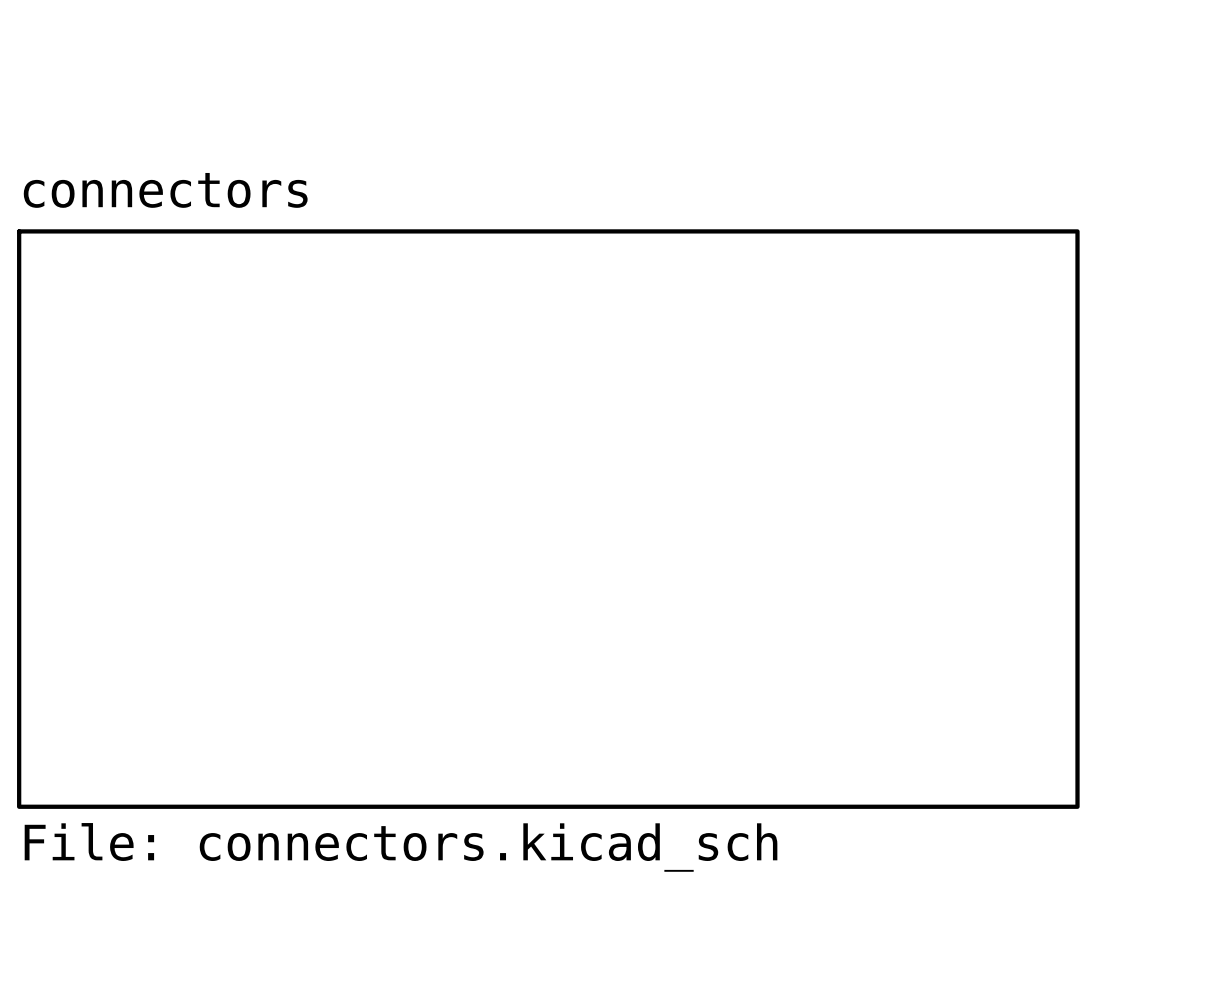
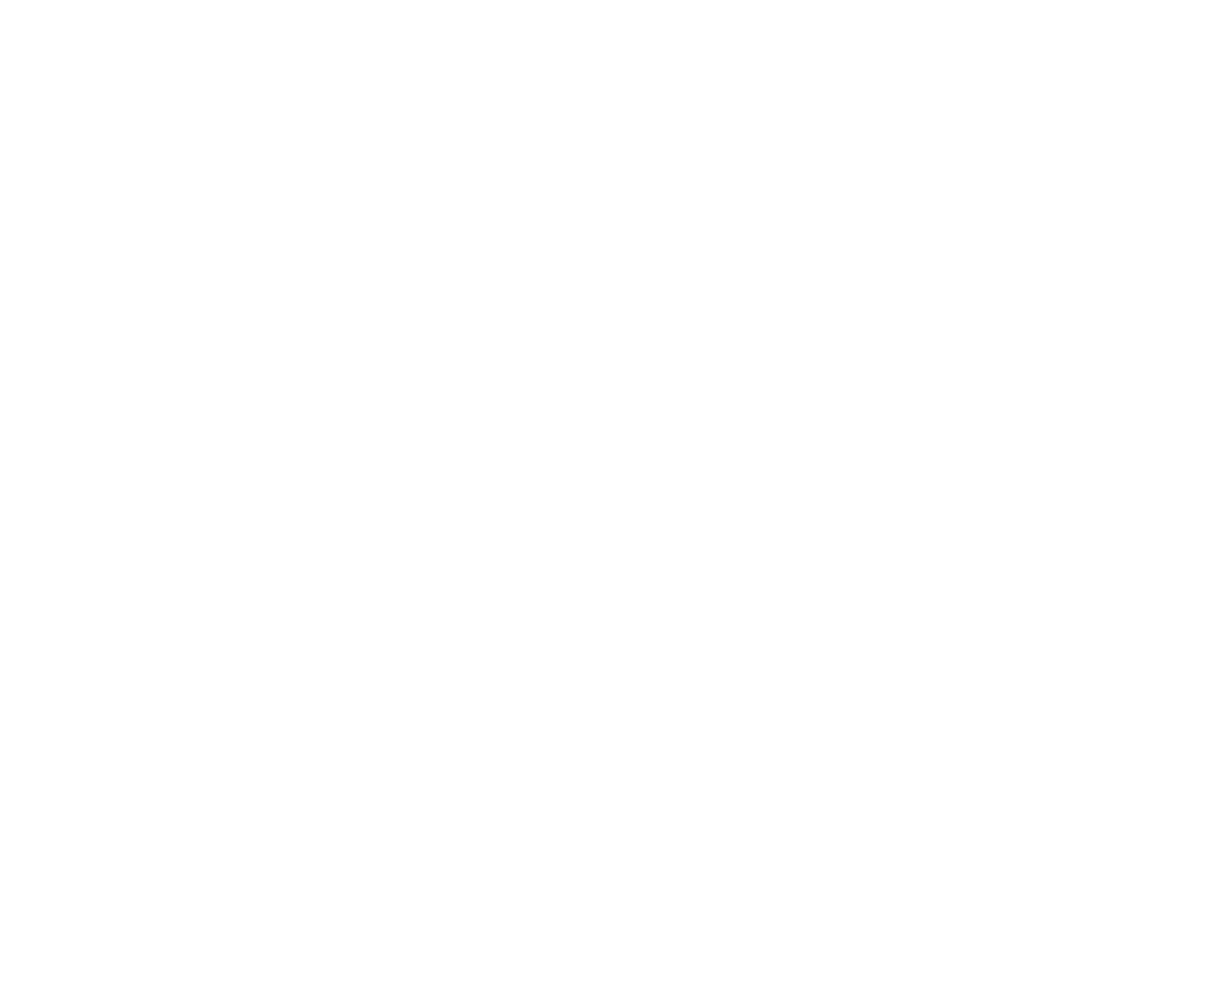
sheet connectors: File: connectors.kicad_sch (548, 519) -> none

